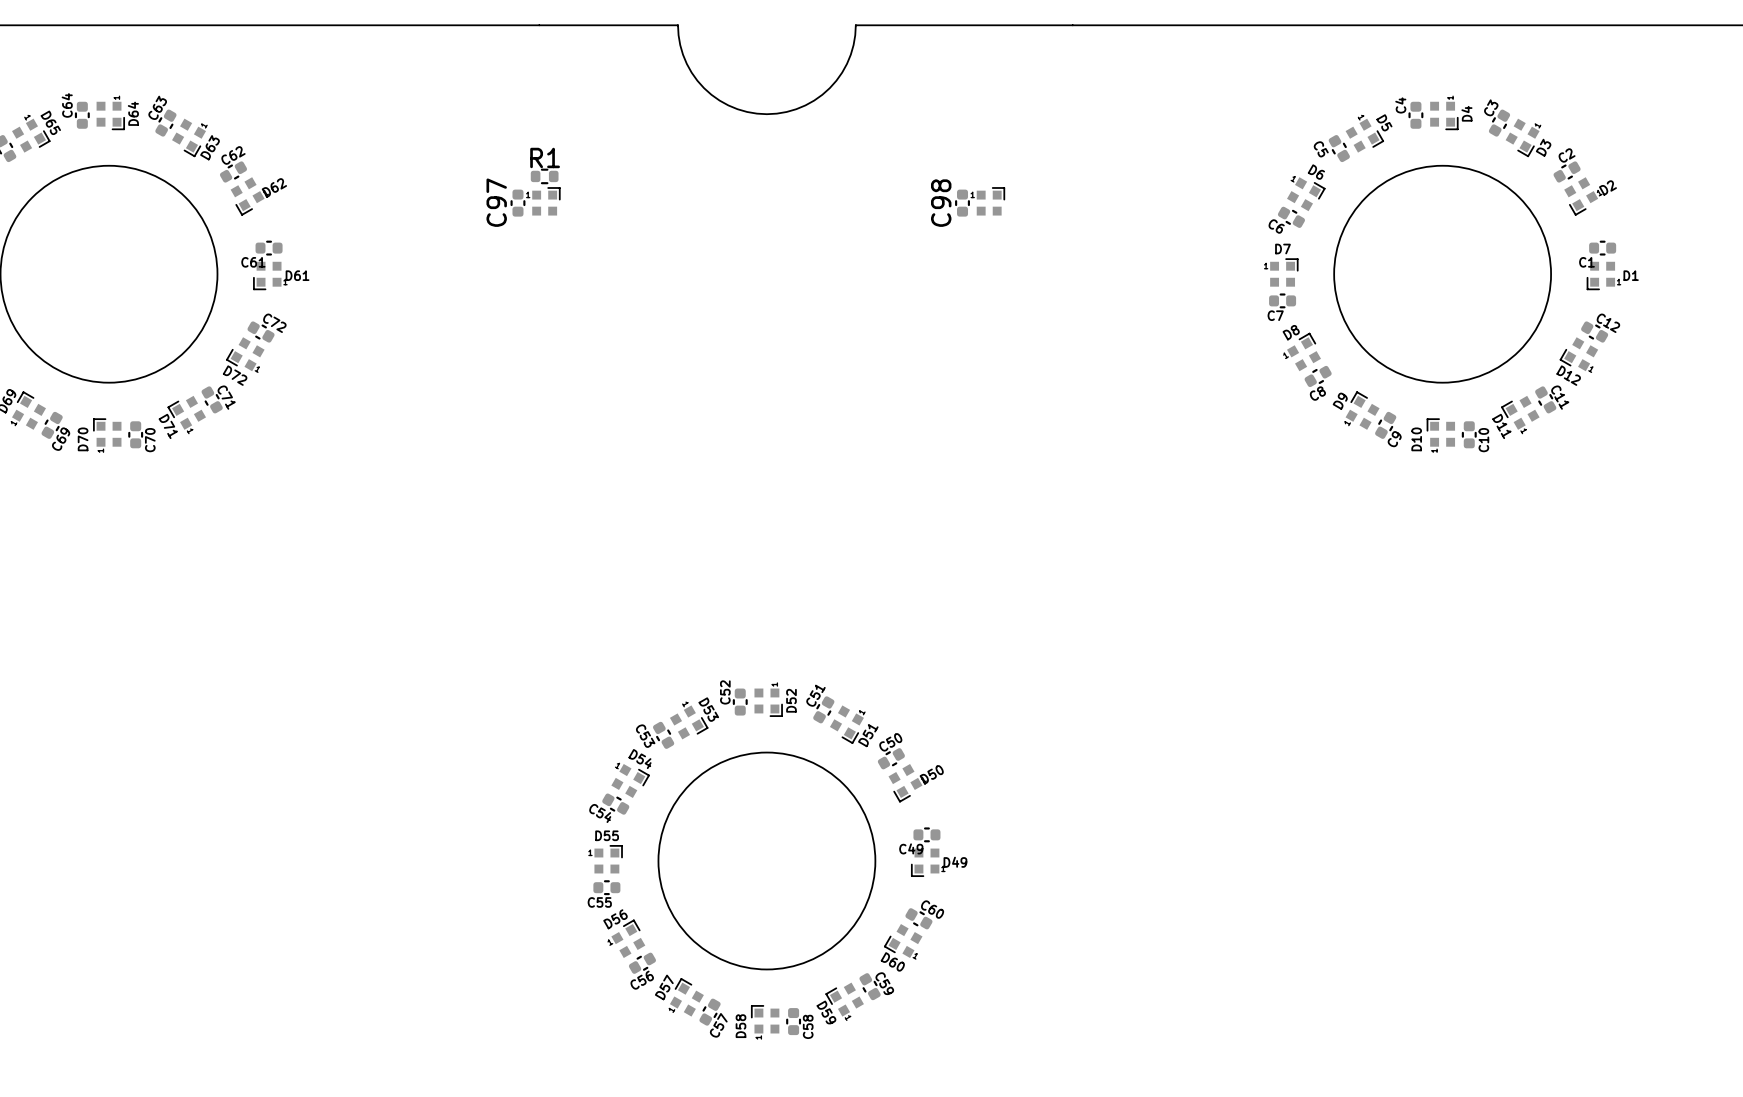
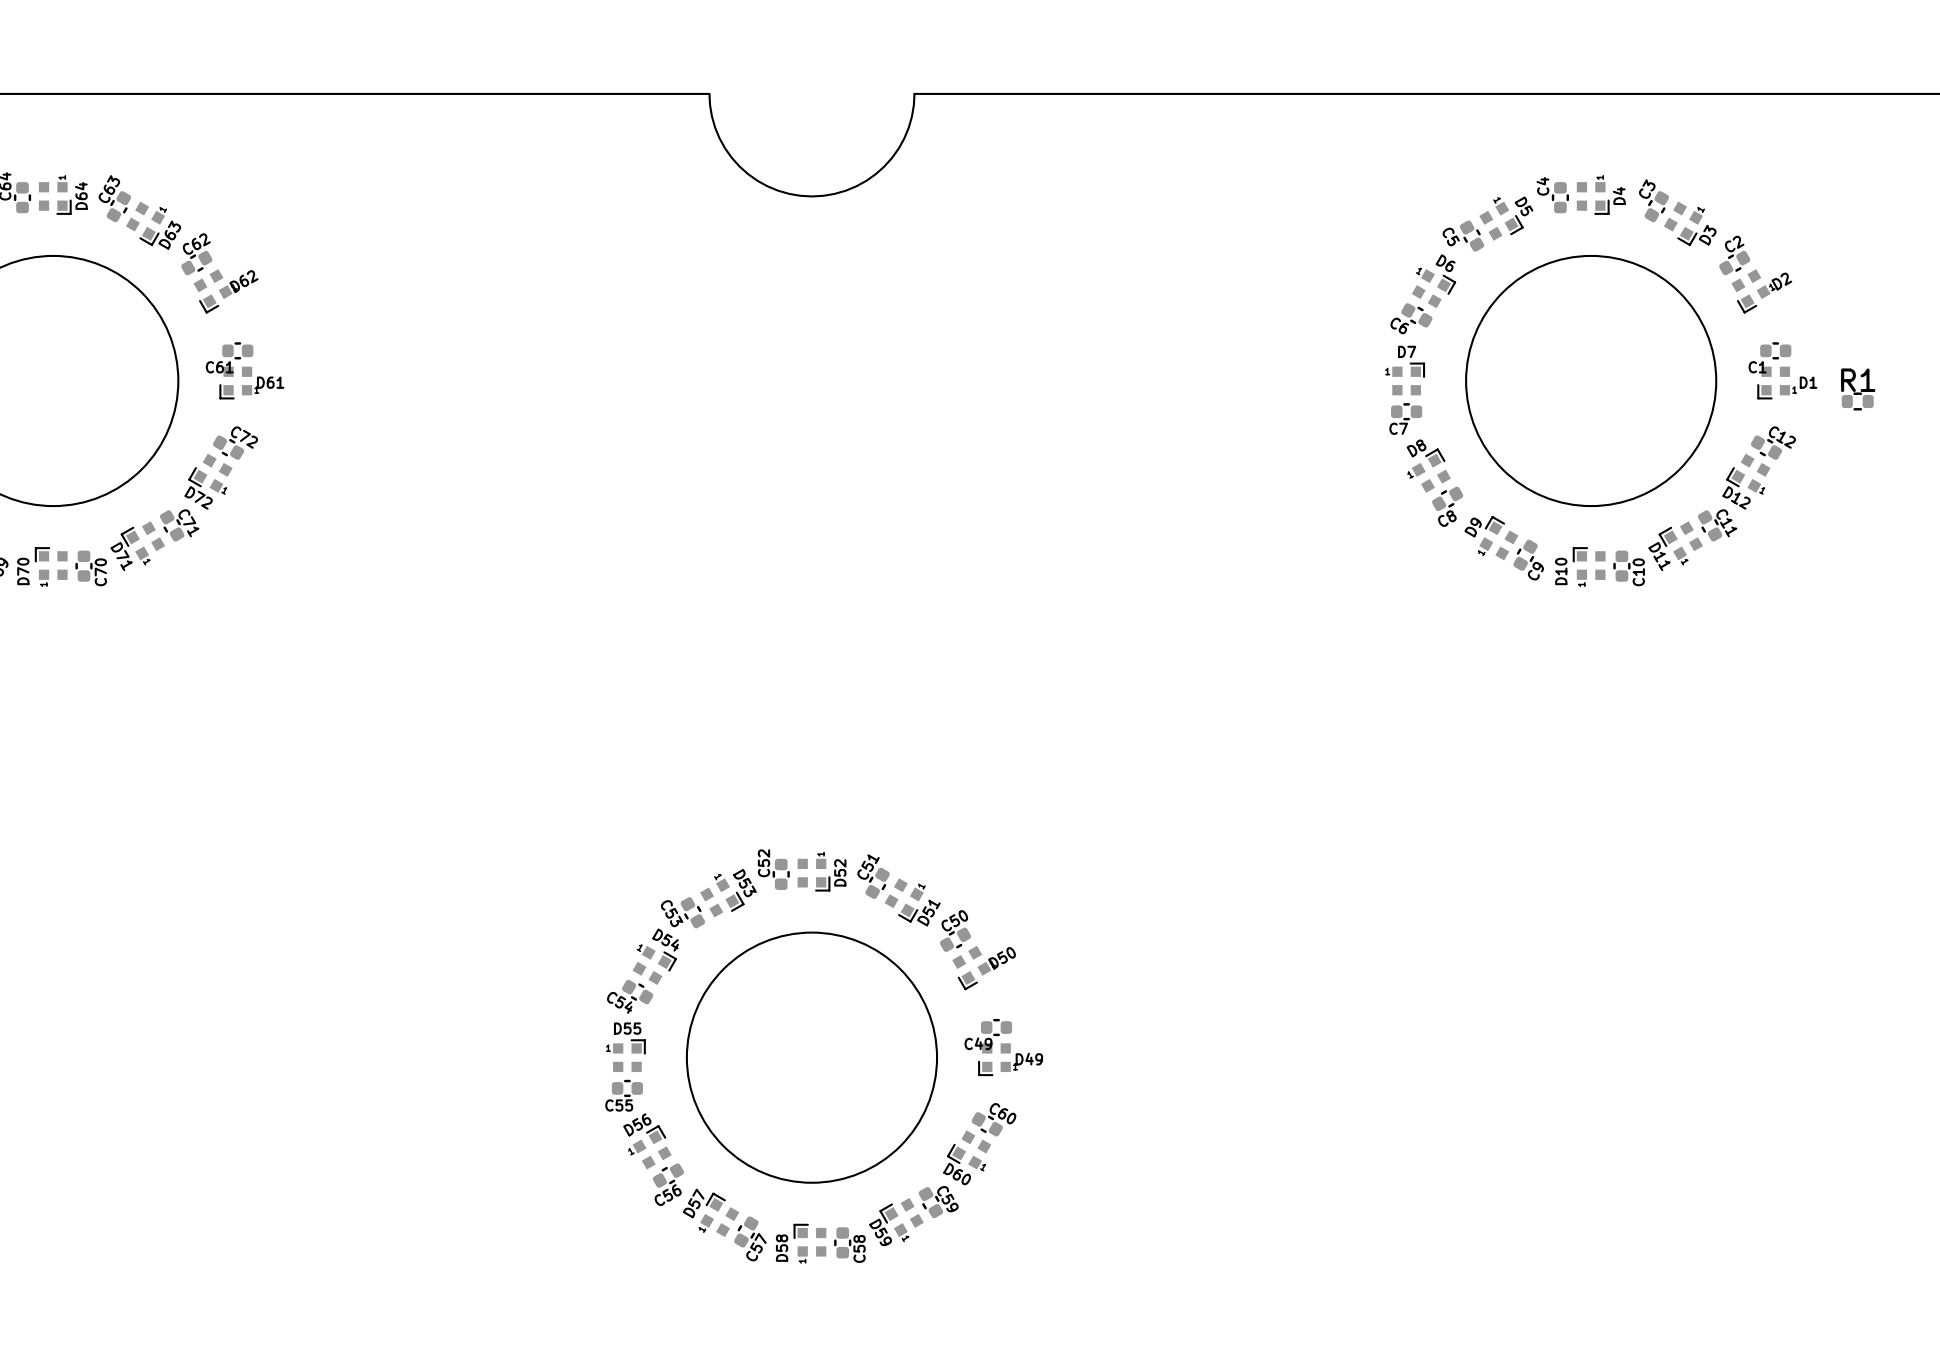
R1 position: (544, 176) -> (1857, 401)
part: (546, 201) -> none
part: (990, 201) -> none
C97: (517, 203) -> none
C98: (962, 203) -> none

